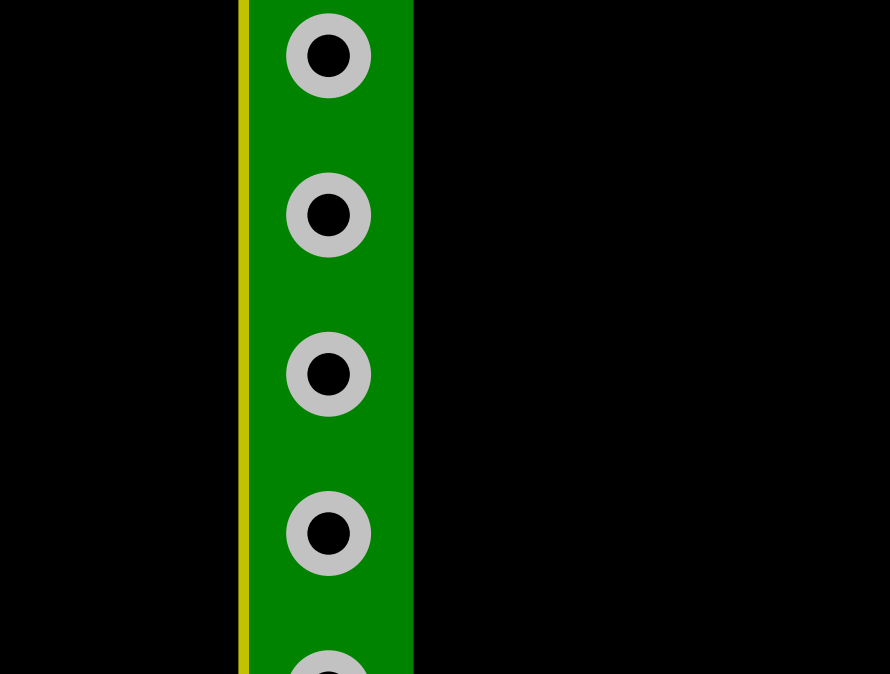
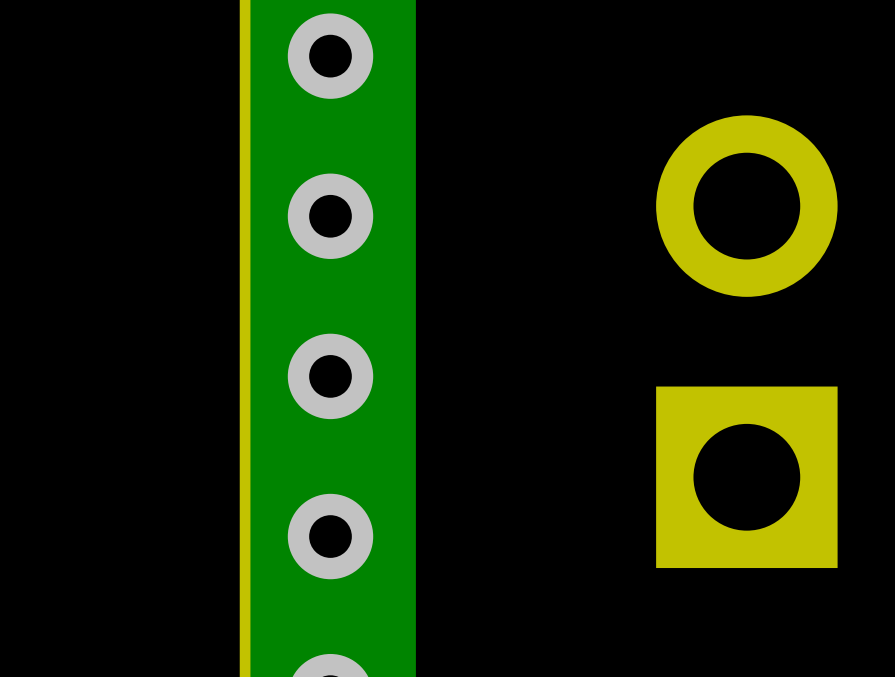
part: none -> (746, 341)

